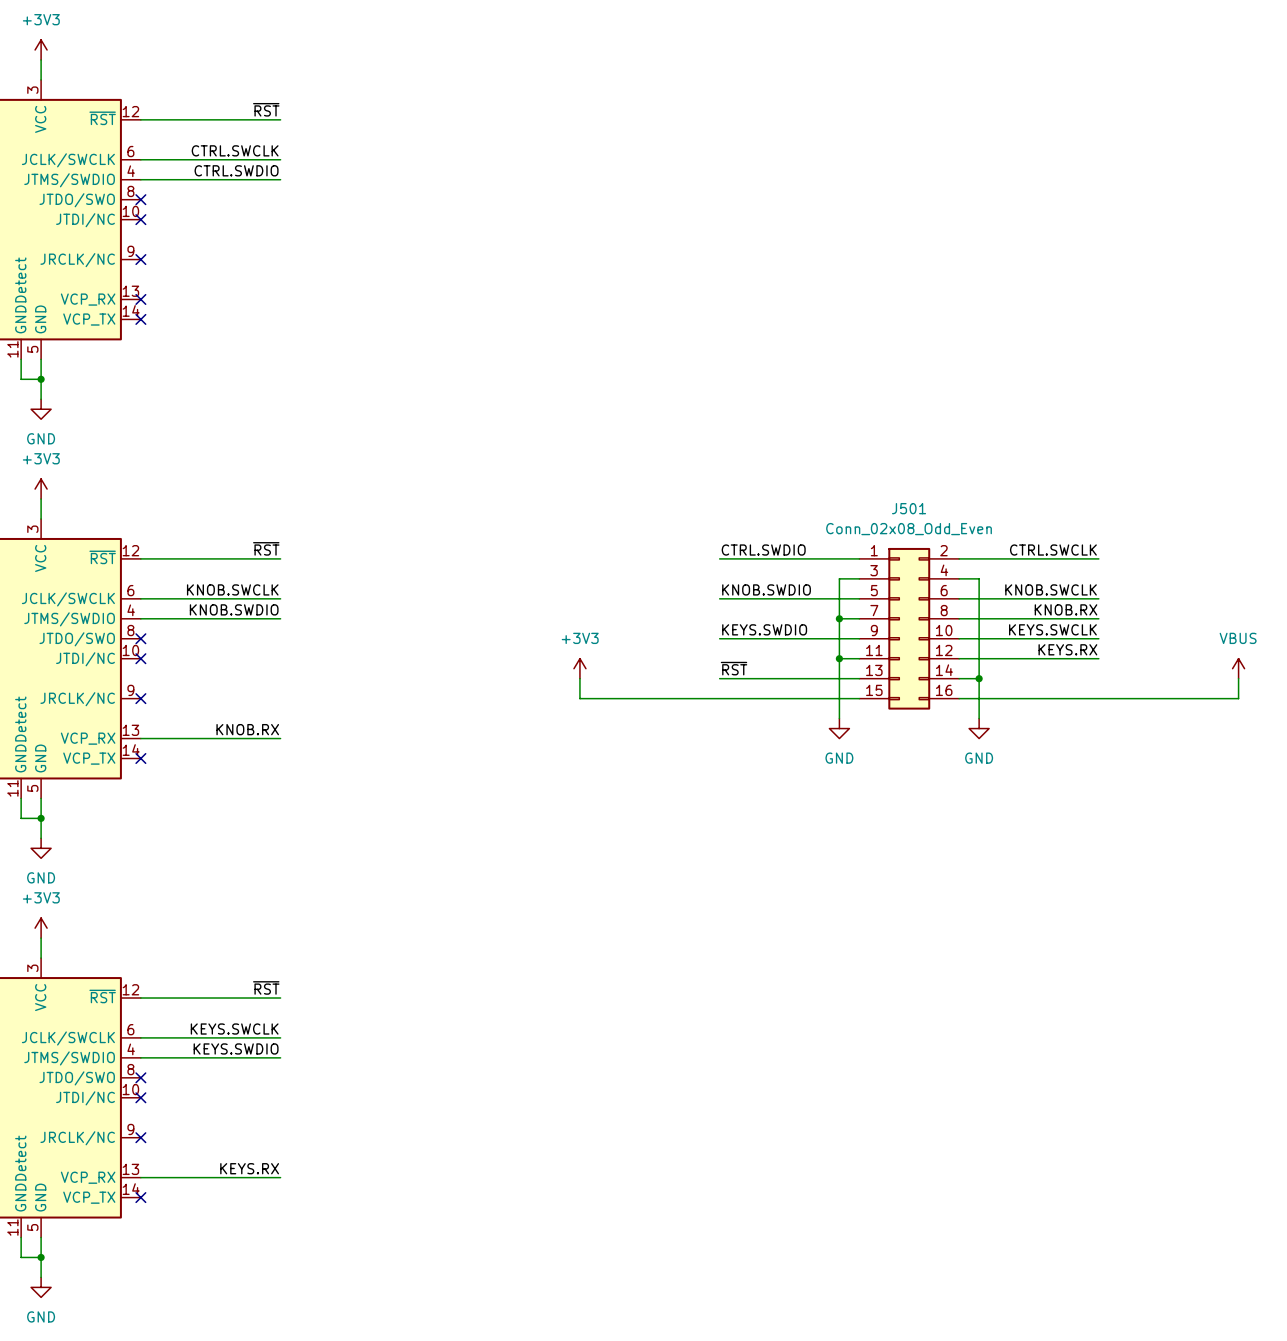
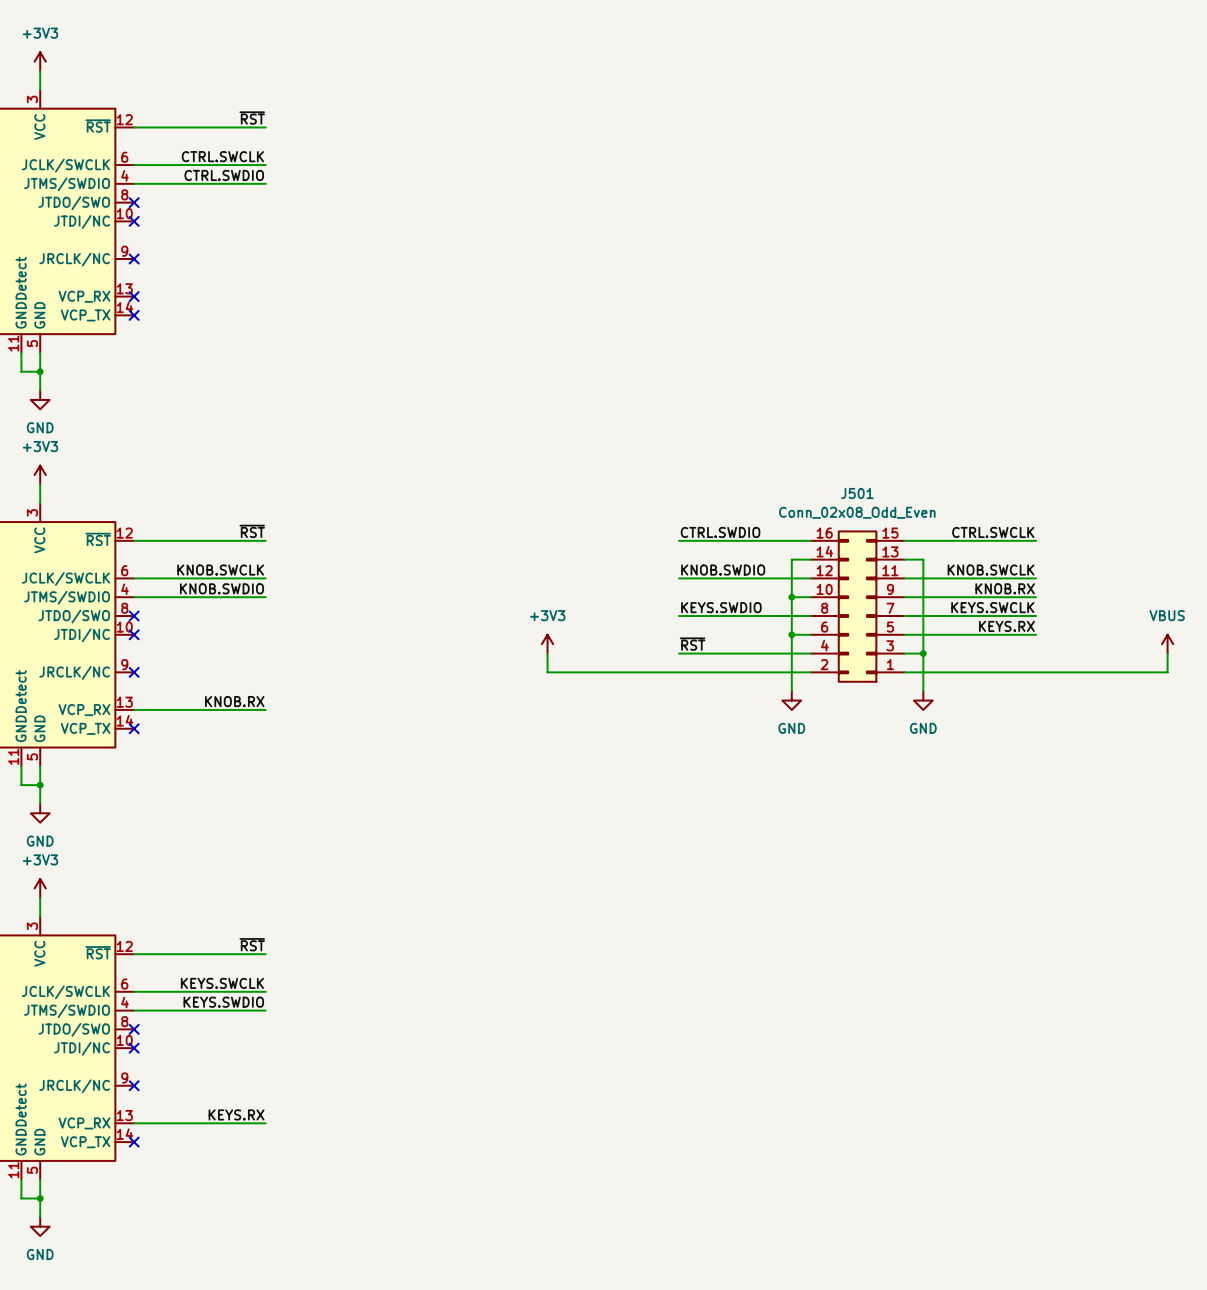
J501 rotation: 0° (909, 628) -> 180° (857, 606)

